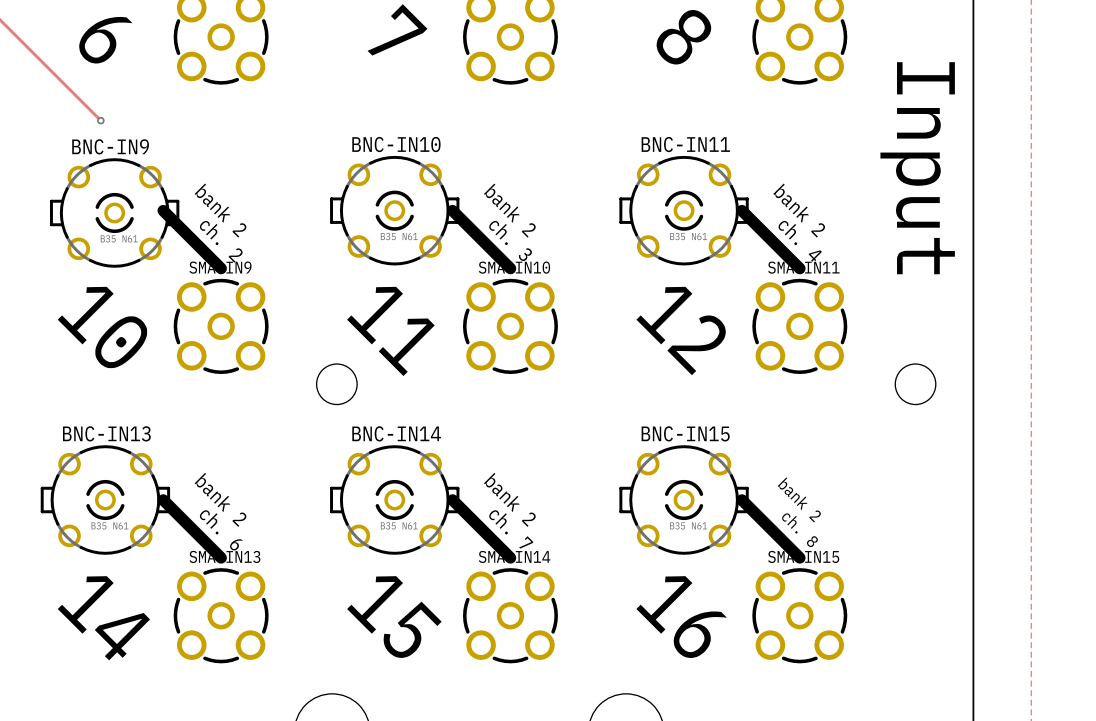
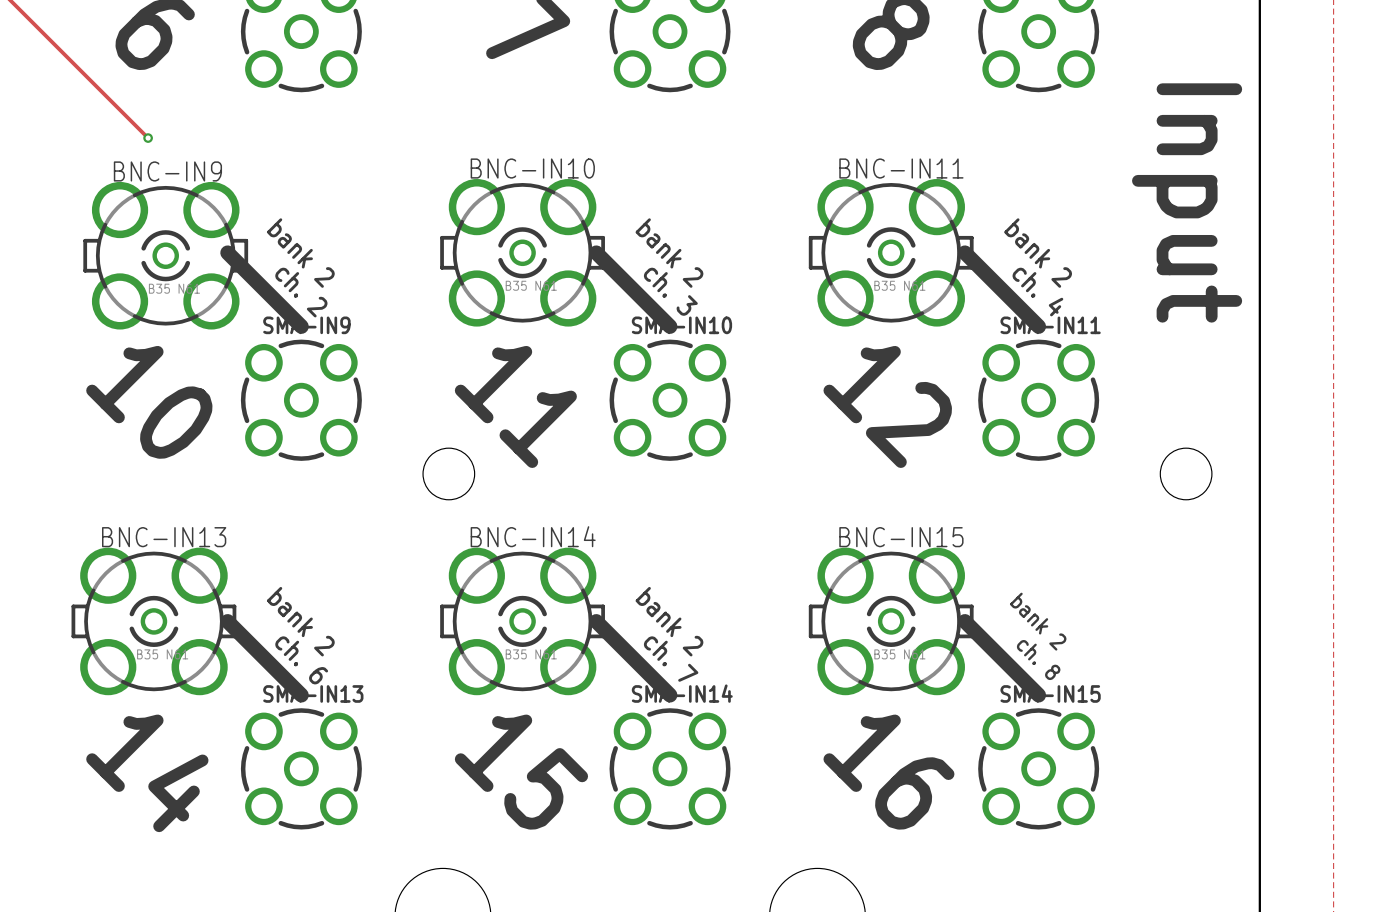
BNC-IN10 footprint: [330, 155, 460, 266] -> [440, 179, 605, 327]
BNC-IN11 footprint: [619, 155, 749, 266] -> [808, 179, 974, 327]
BNC-IN9 footprint: [49, 158, 180, 268] -> [83, 181, 249, 330]
BNC-IN13 footprint: [40, 445, 171, 555] -> [71, 547, 237, 696]
BNC-IN14 footprint: [330, 445, 460, 555] -> [440, 547, 605, 696]
BNC-IN15 footprint: [619, 445, 749, 555] -> [808, 547, 974, 696]

